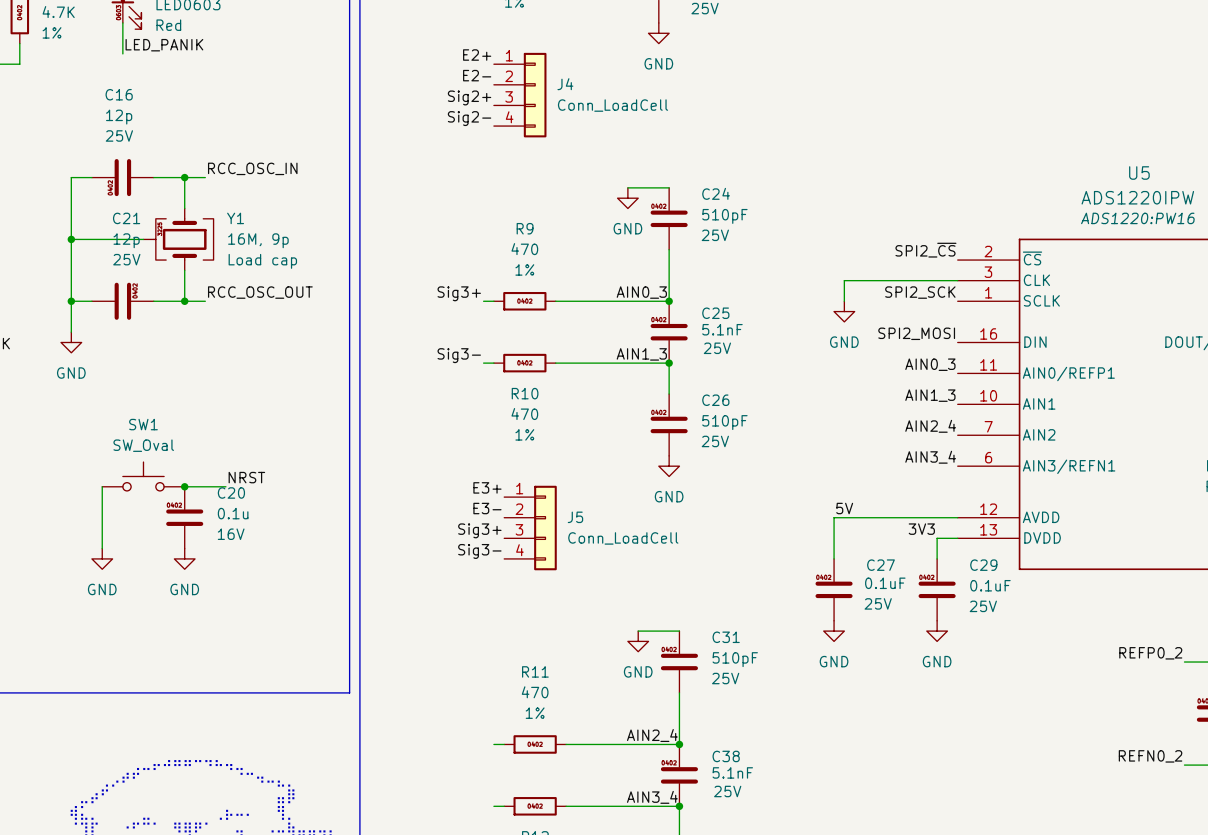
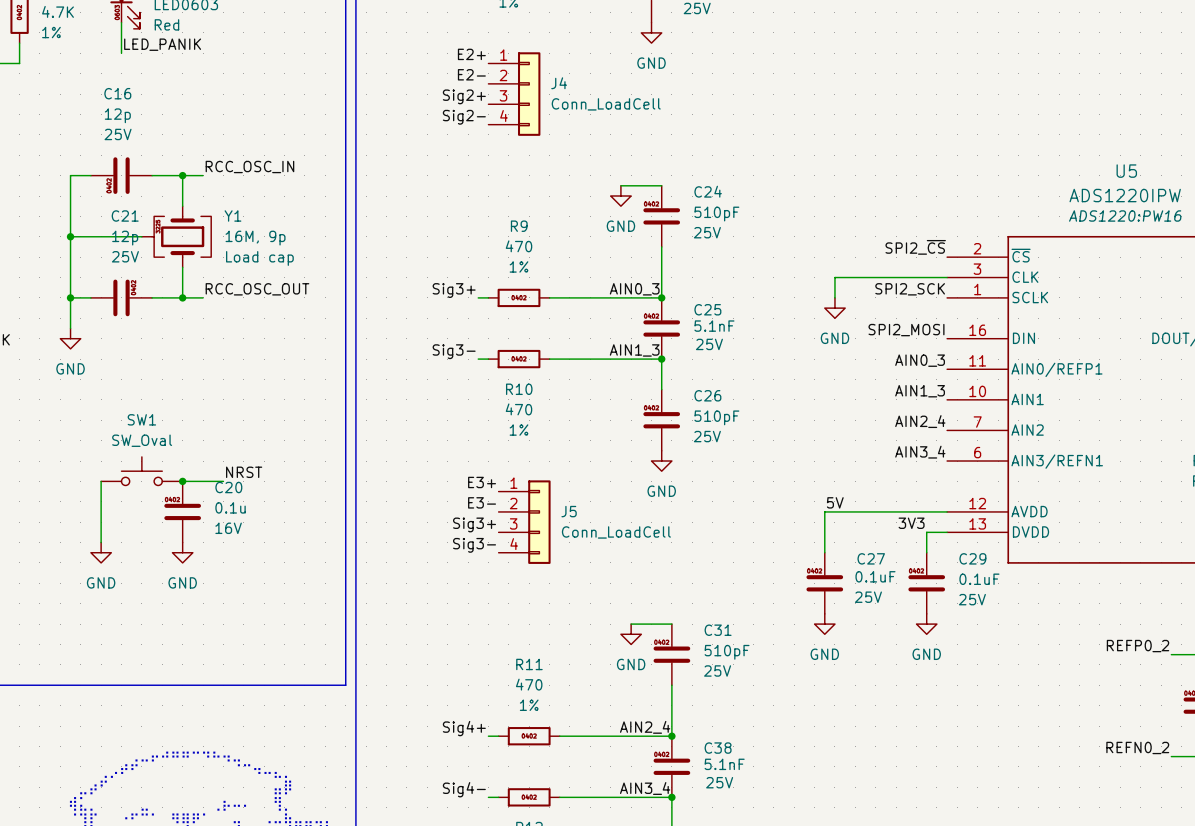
label: none -> Sig4+ (464, 728)
label: none -> Sig4- (464, 789)

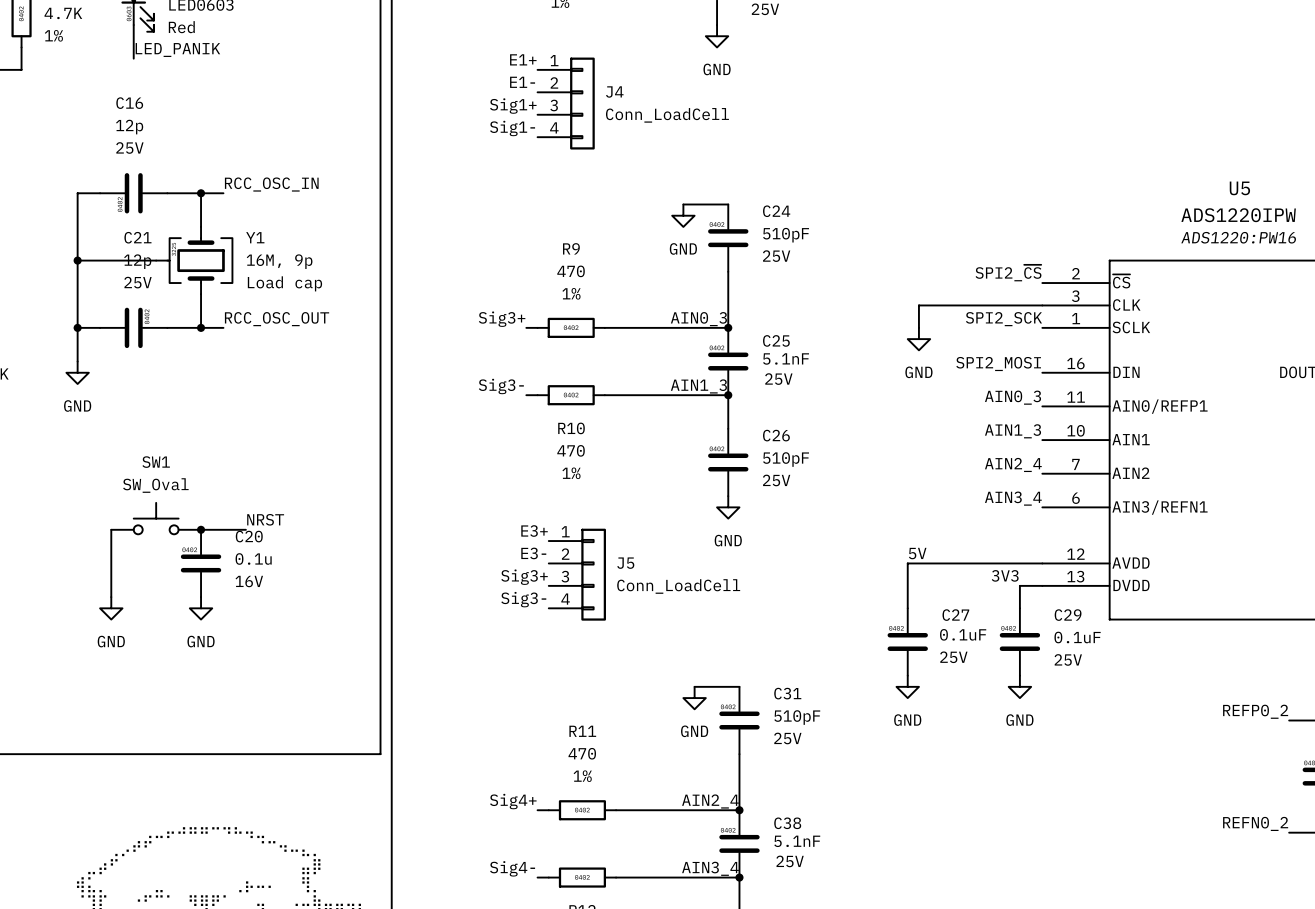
label: E2+ (471, 54) -> E1+ (523, 59)
label: E2- (471, 74) -> E1- (522, 82)
label: Sig2+ (464, 96) -> Sig1+ (513, 106)
label: Sig2- (464, 117) -> Sig1- (512, 128)

